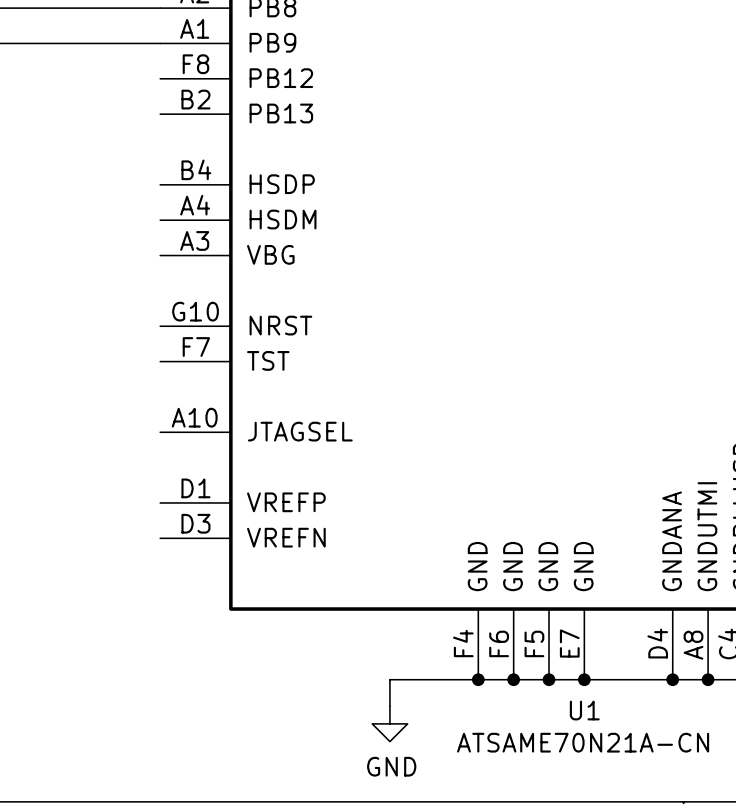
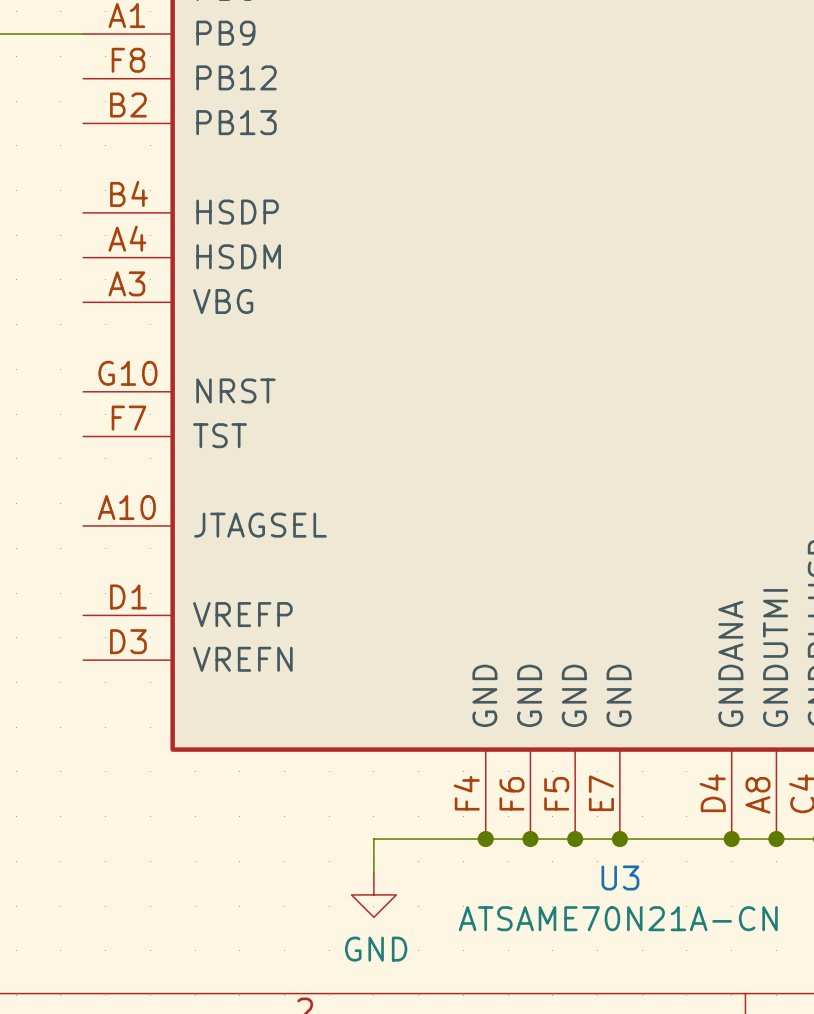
U1 name: U1 (584, 710) -> U3 (620, 878)

